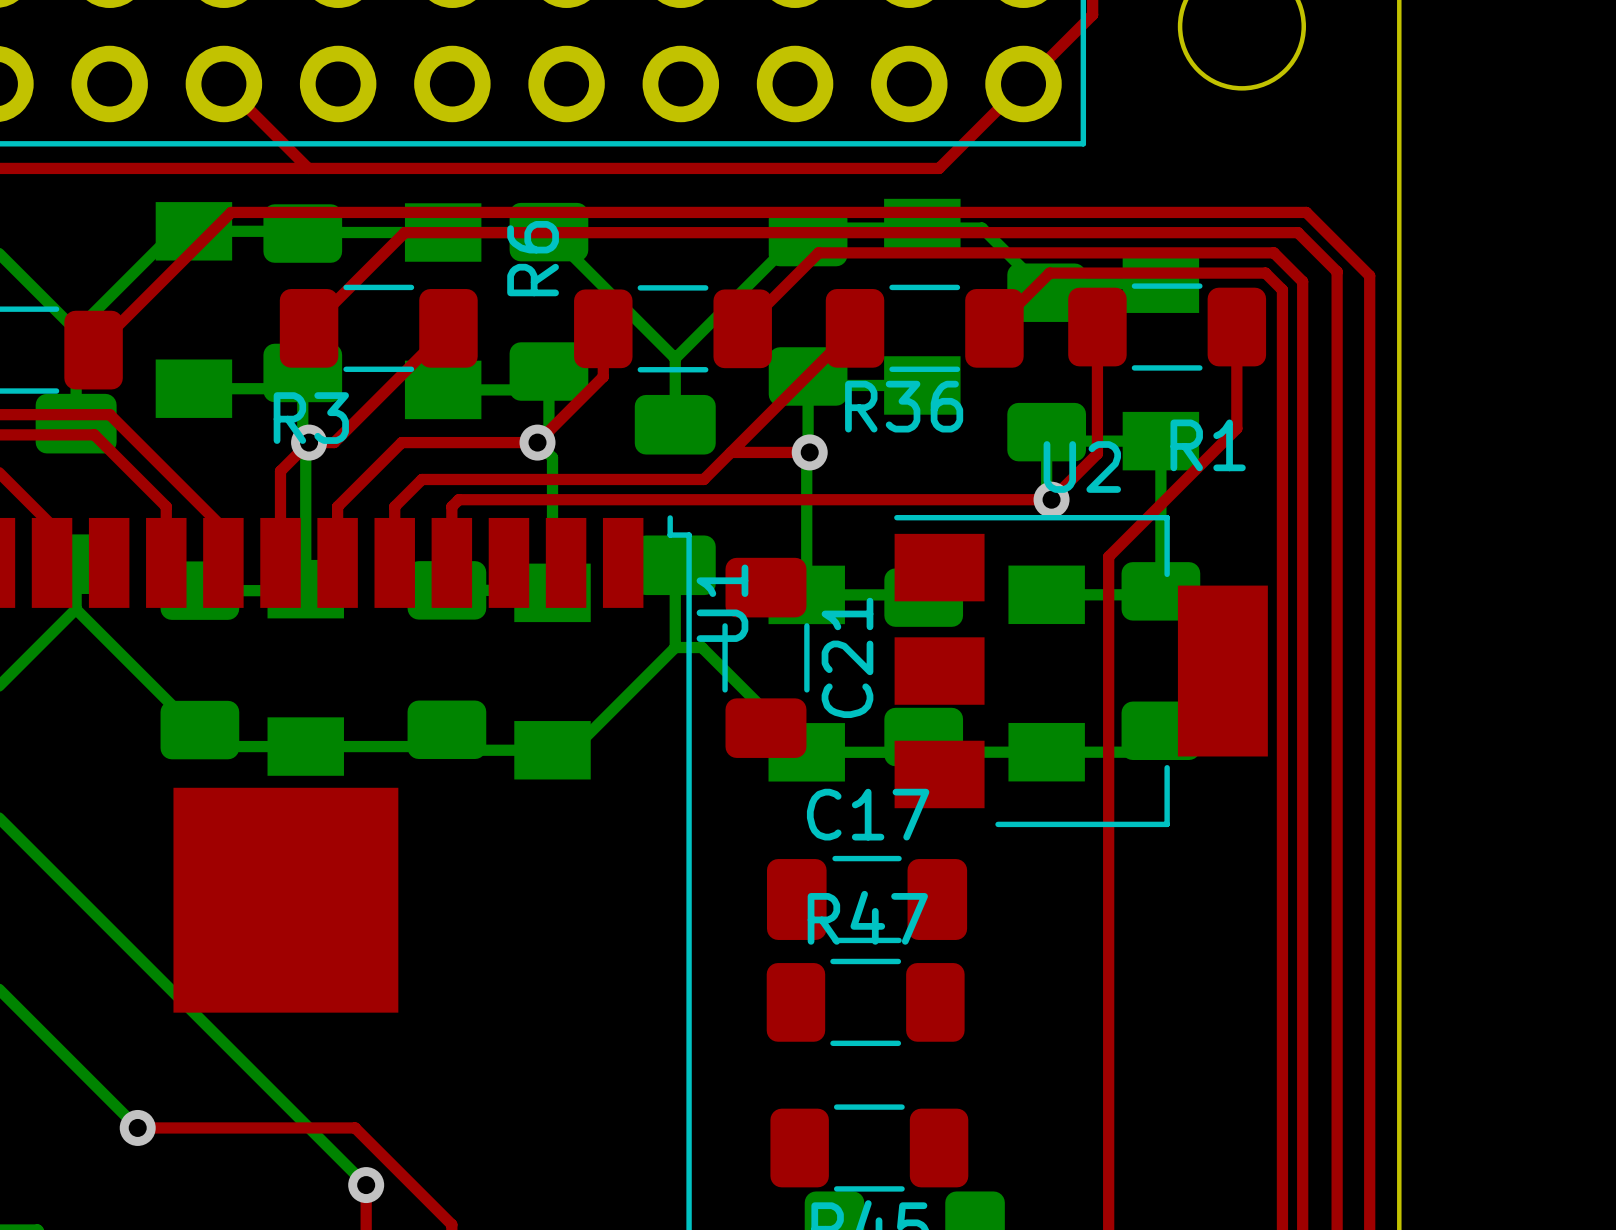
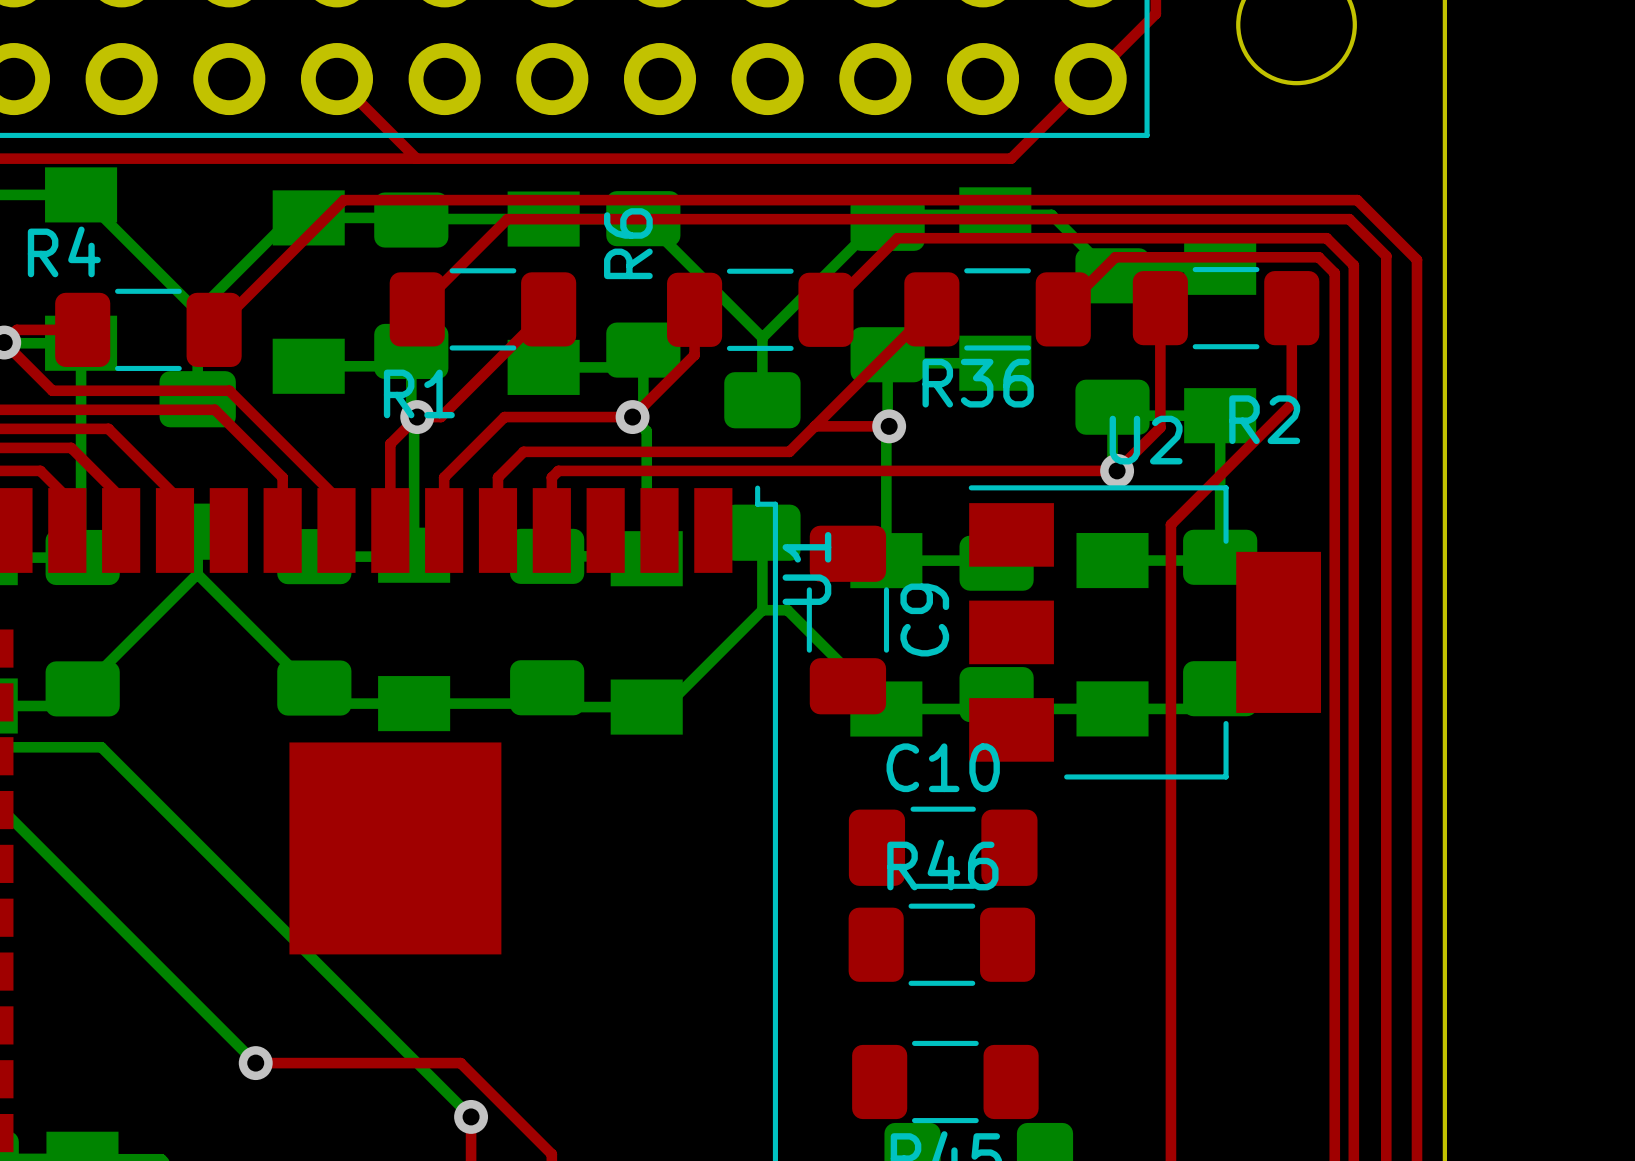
R3 name: R3 (311, 418) -> R1 (419, 393)
R1 name: R1 (1208, 445) -> R2 (1264, 419)
C21 name: C21 (847, 657) -> C9 (924, 620)
C17 name: C17 (868, 814) -> C10 (943, 767)
R47 name: R47 (867, 917) -> R46 (942, 864)

